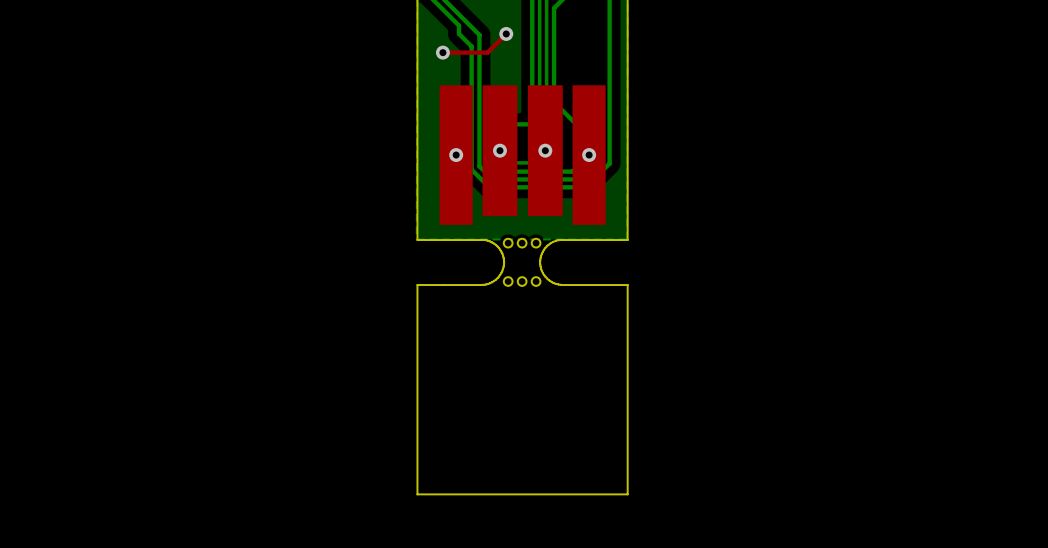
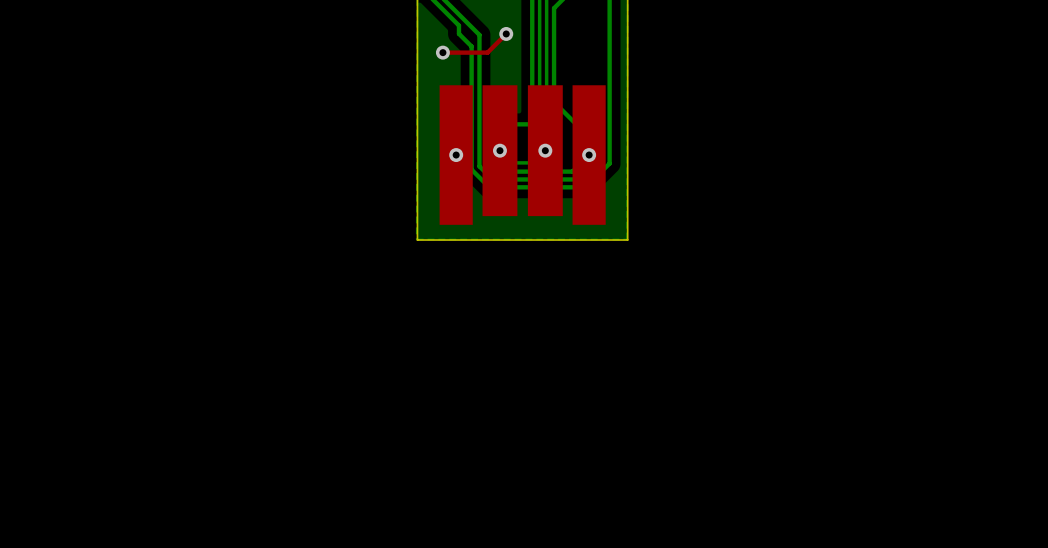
board edge: (483, 240) (497, 246) (503, 257) (502, 271) (493, 281) (481, 285) (417, 285) (417, 494) (627, 494) (627, 285) (563, 285) (550, 281) (541, 270) (540, 257) (548, 244) (561, 240) -> (483, 240) (561, 240)
part: (522, 262) -> none

